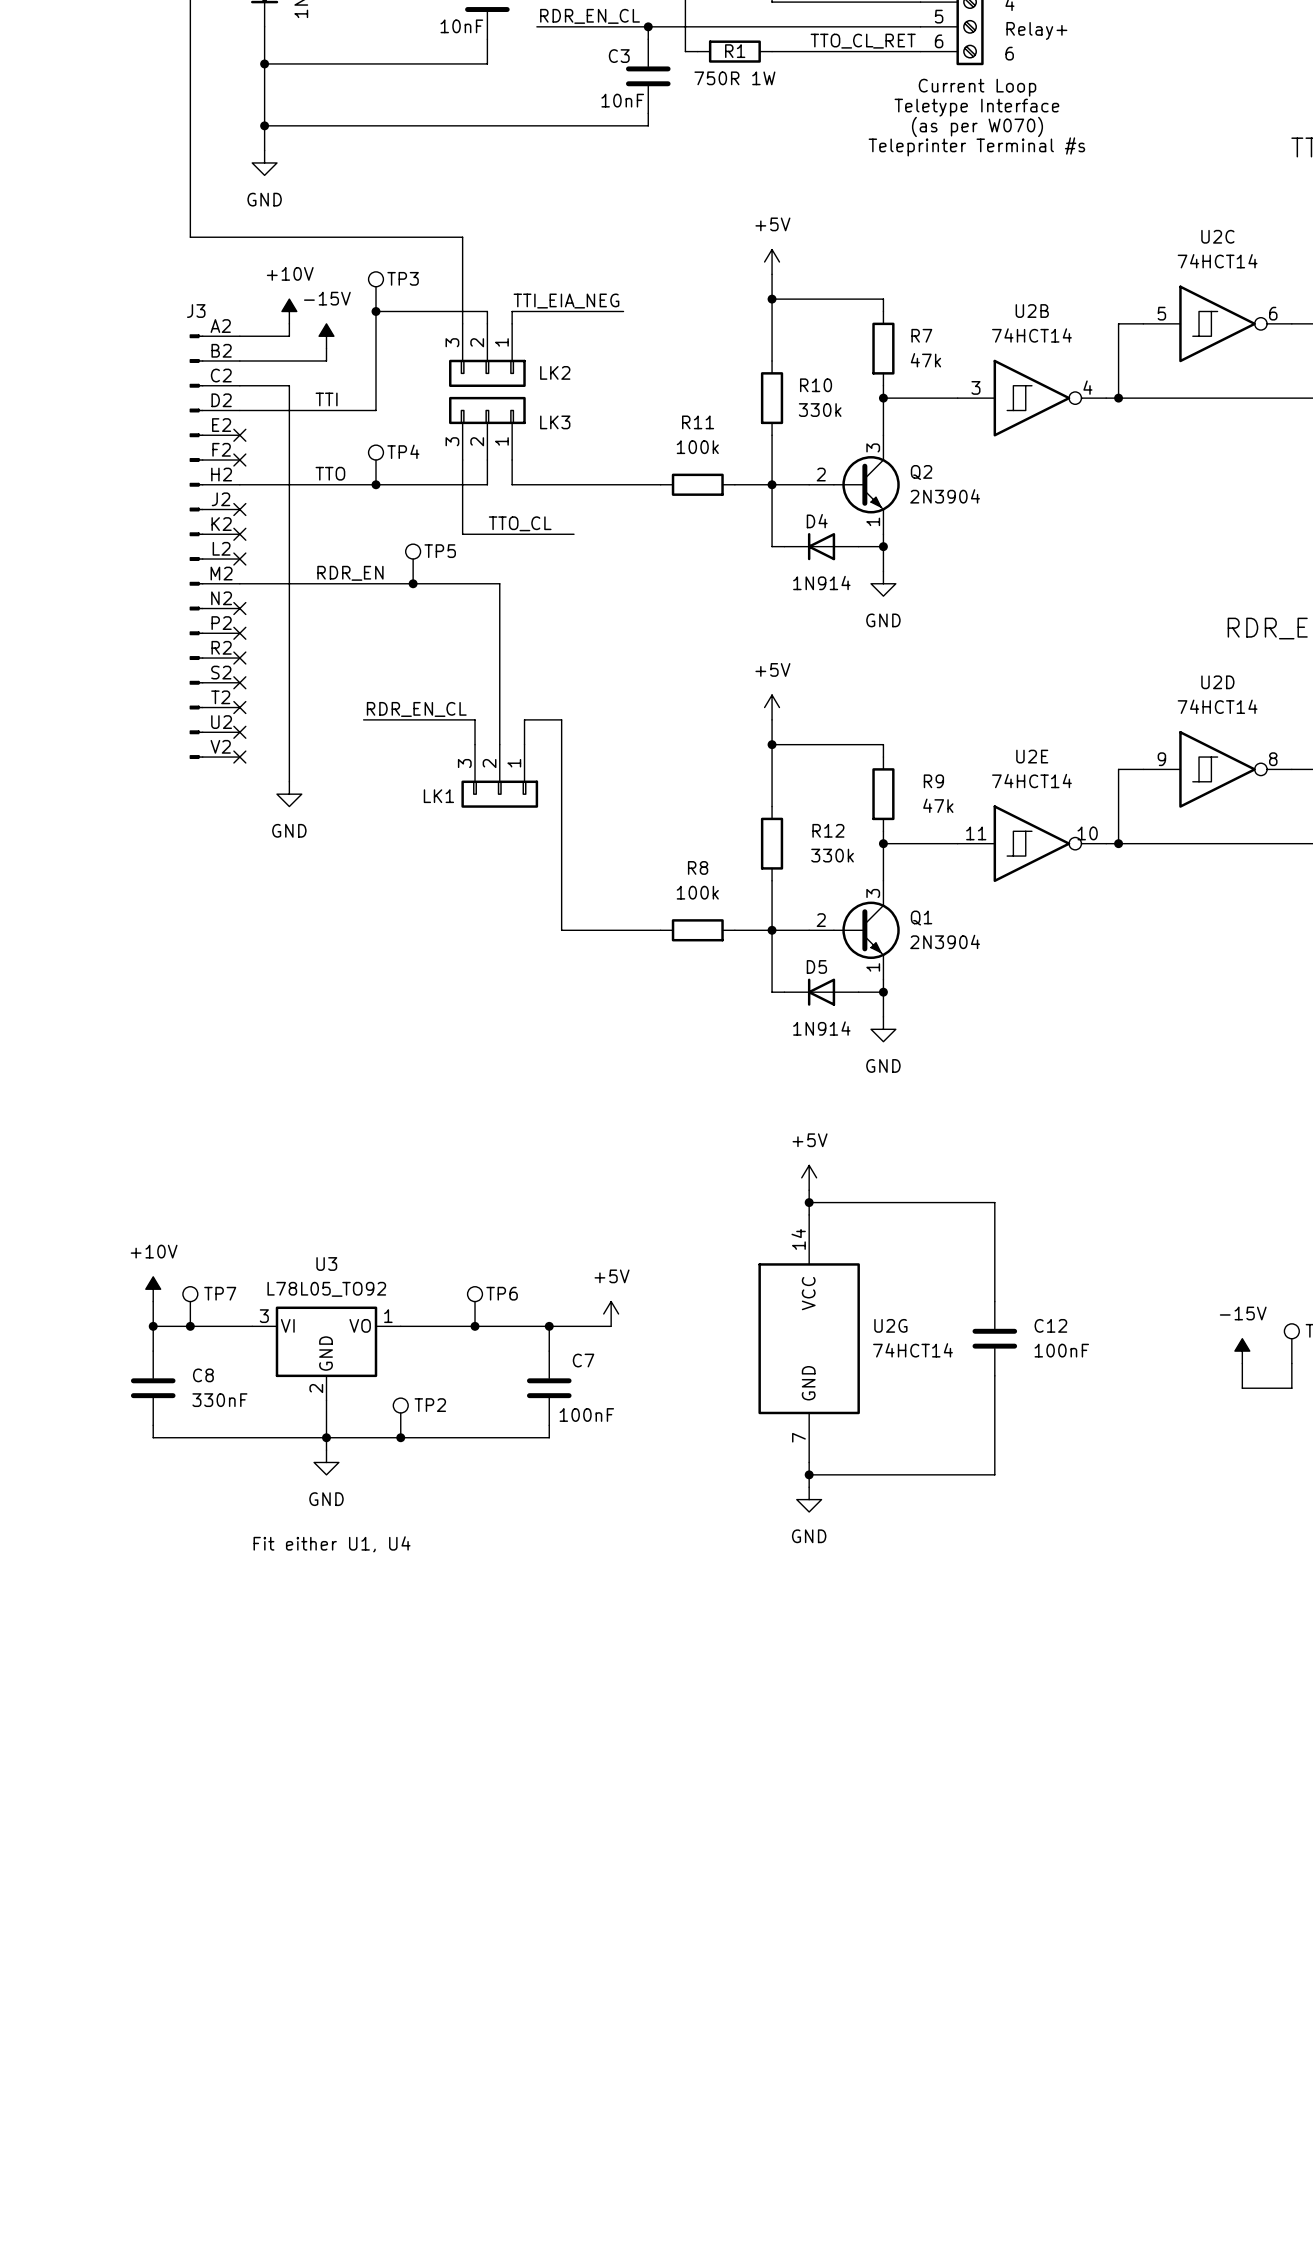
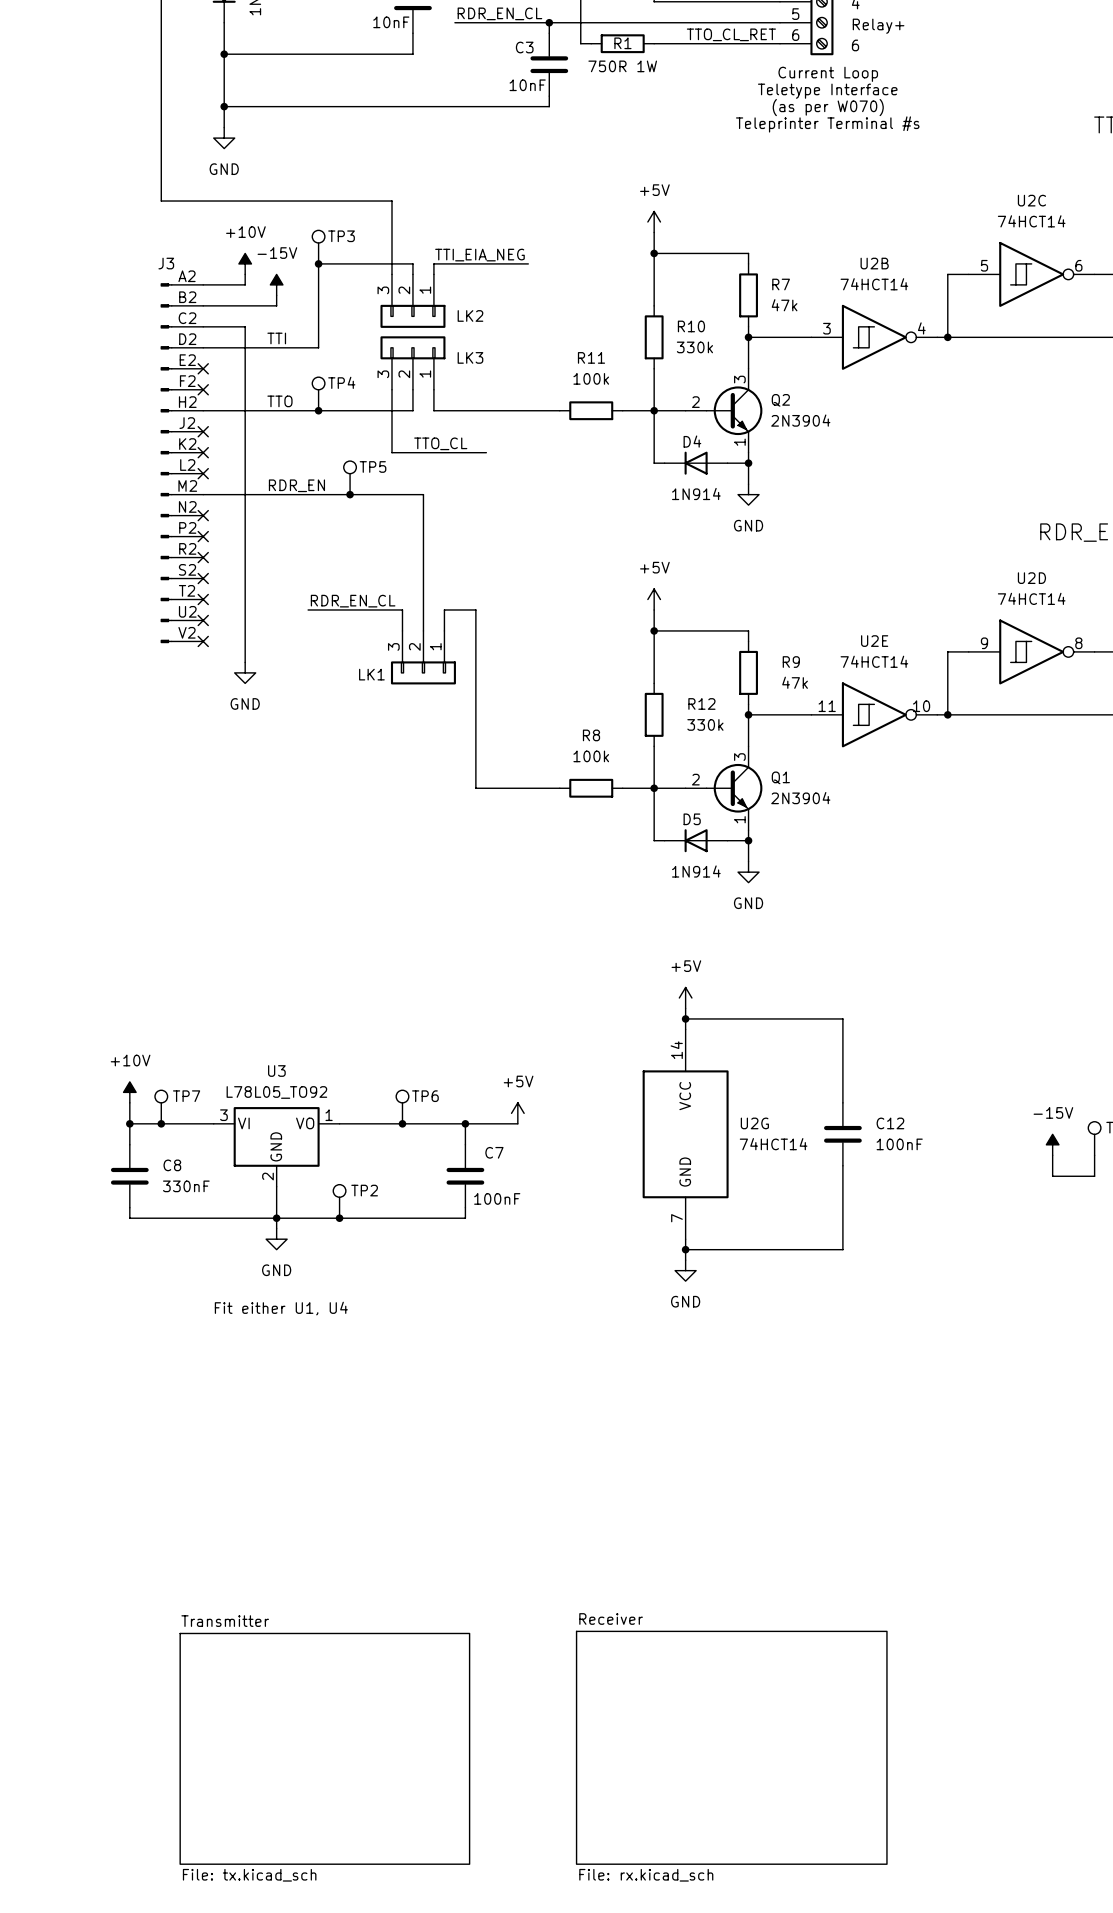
sheet Receiver: none -> File: rx.kicad_sch (731, 1747)
sheet Transmitter: none -> File: tx.kicad_sch (324, 1748)

